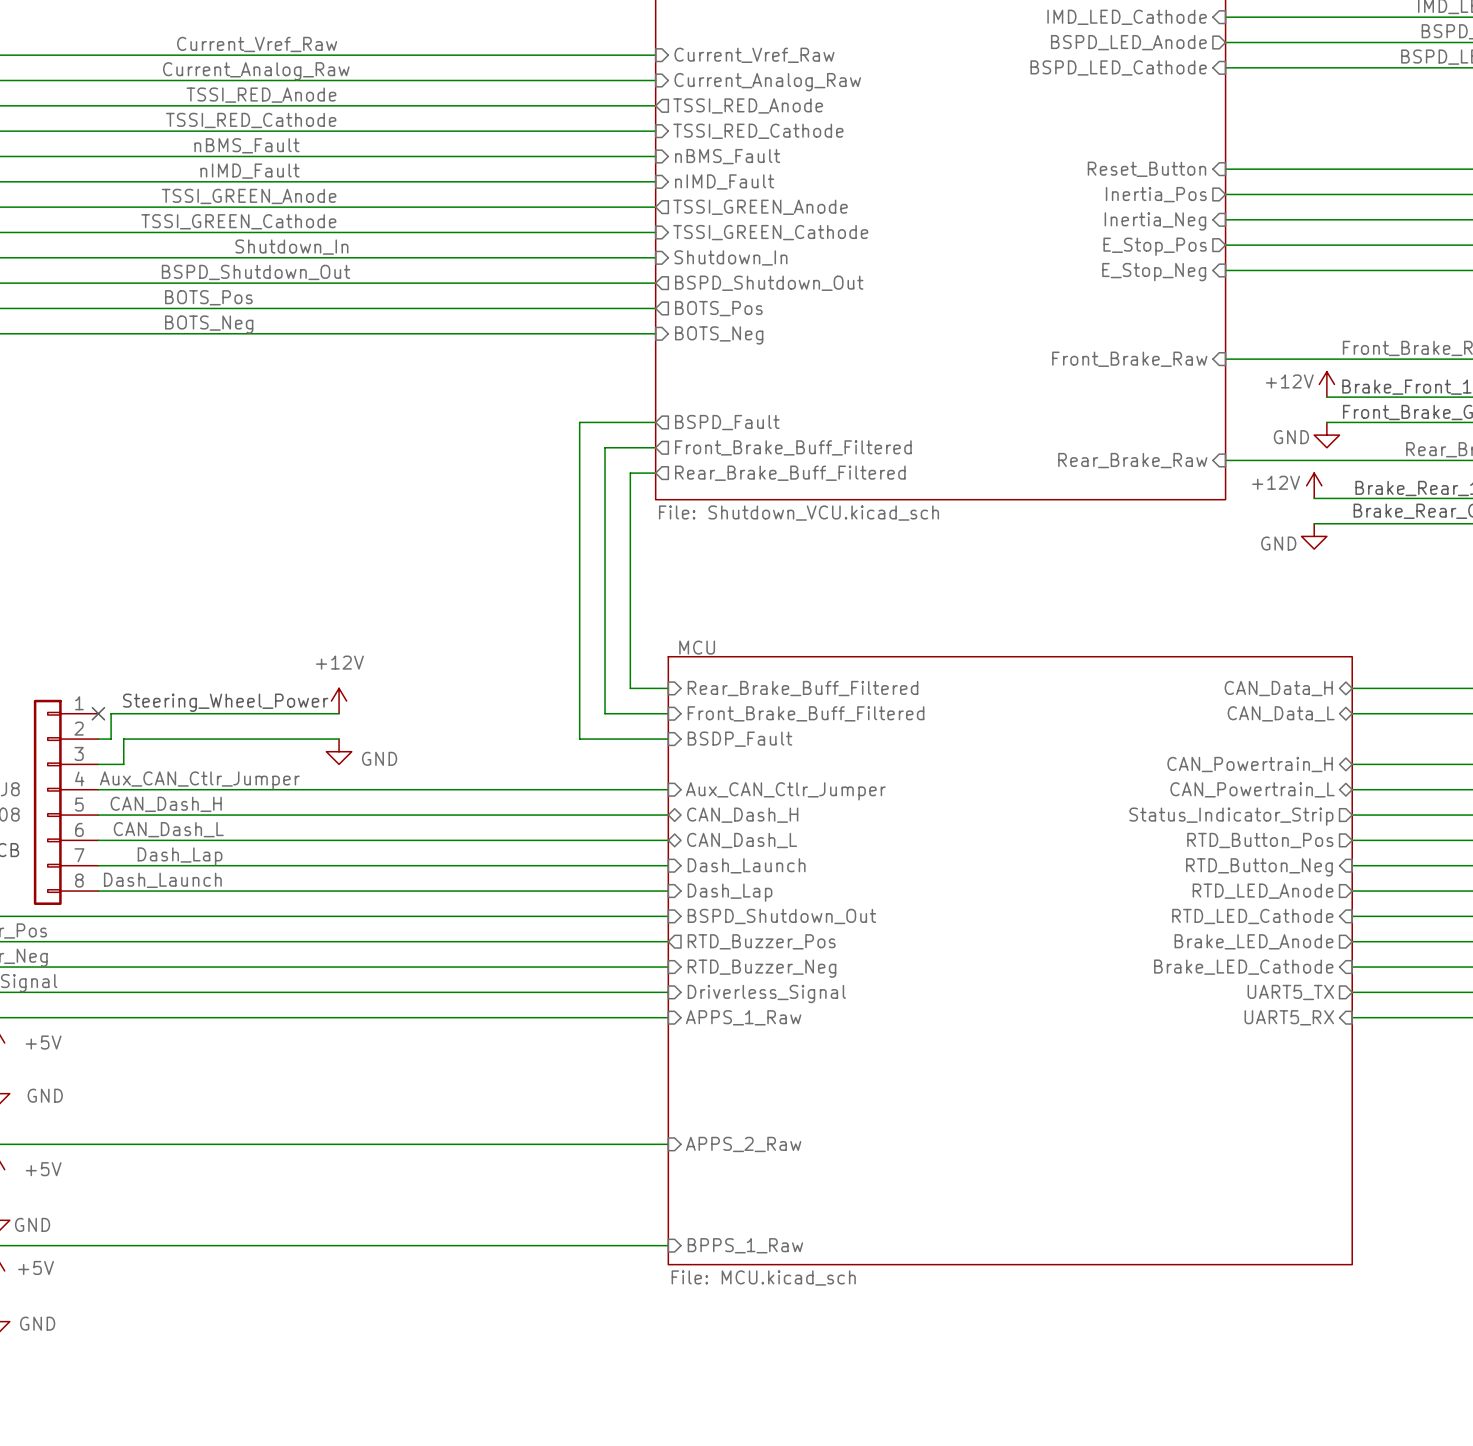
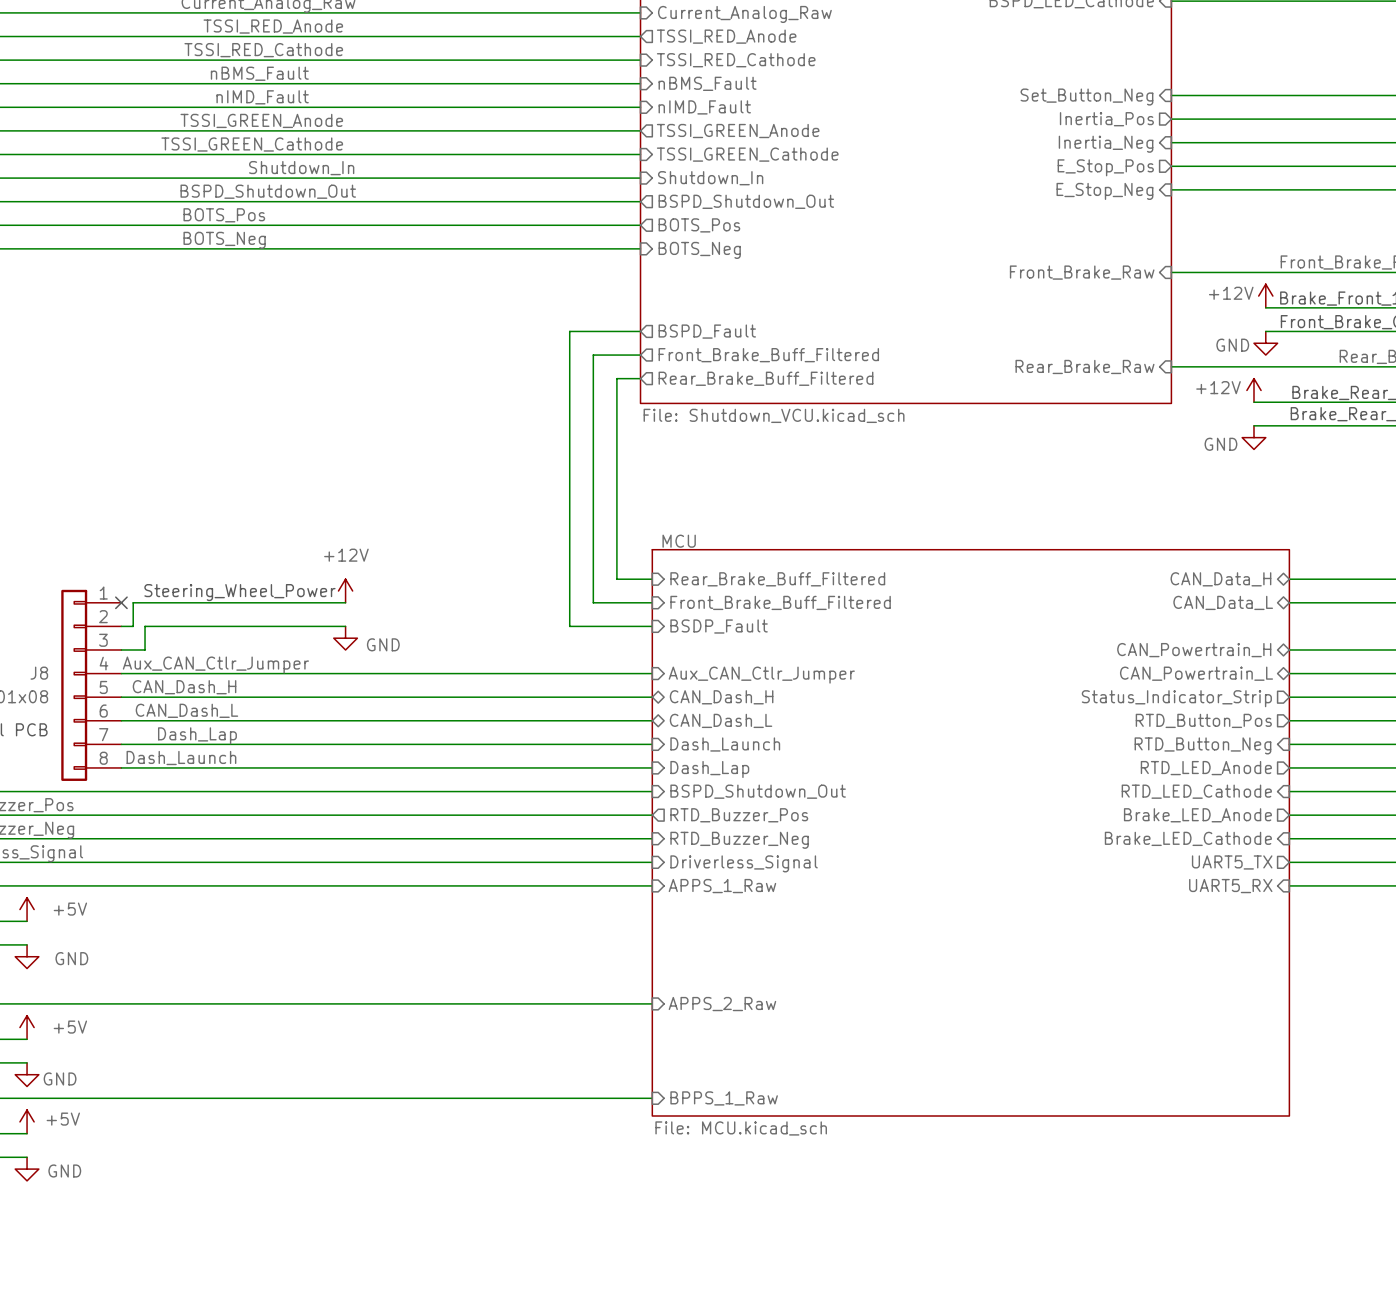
sheet pin: Reset_Button (1146, 169) -> Set_Button_Neg (1086, 97)

